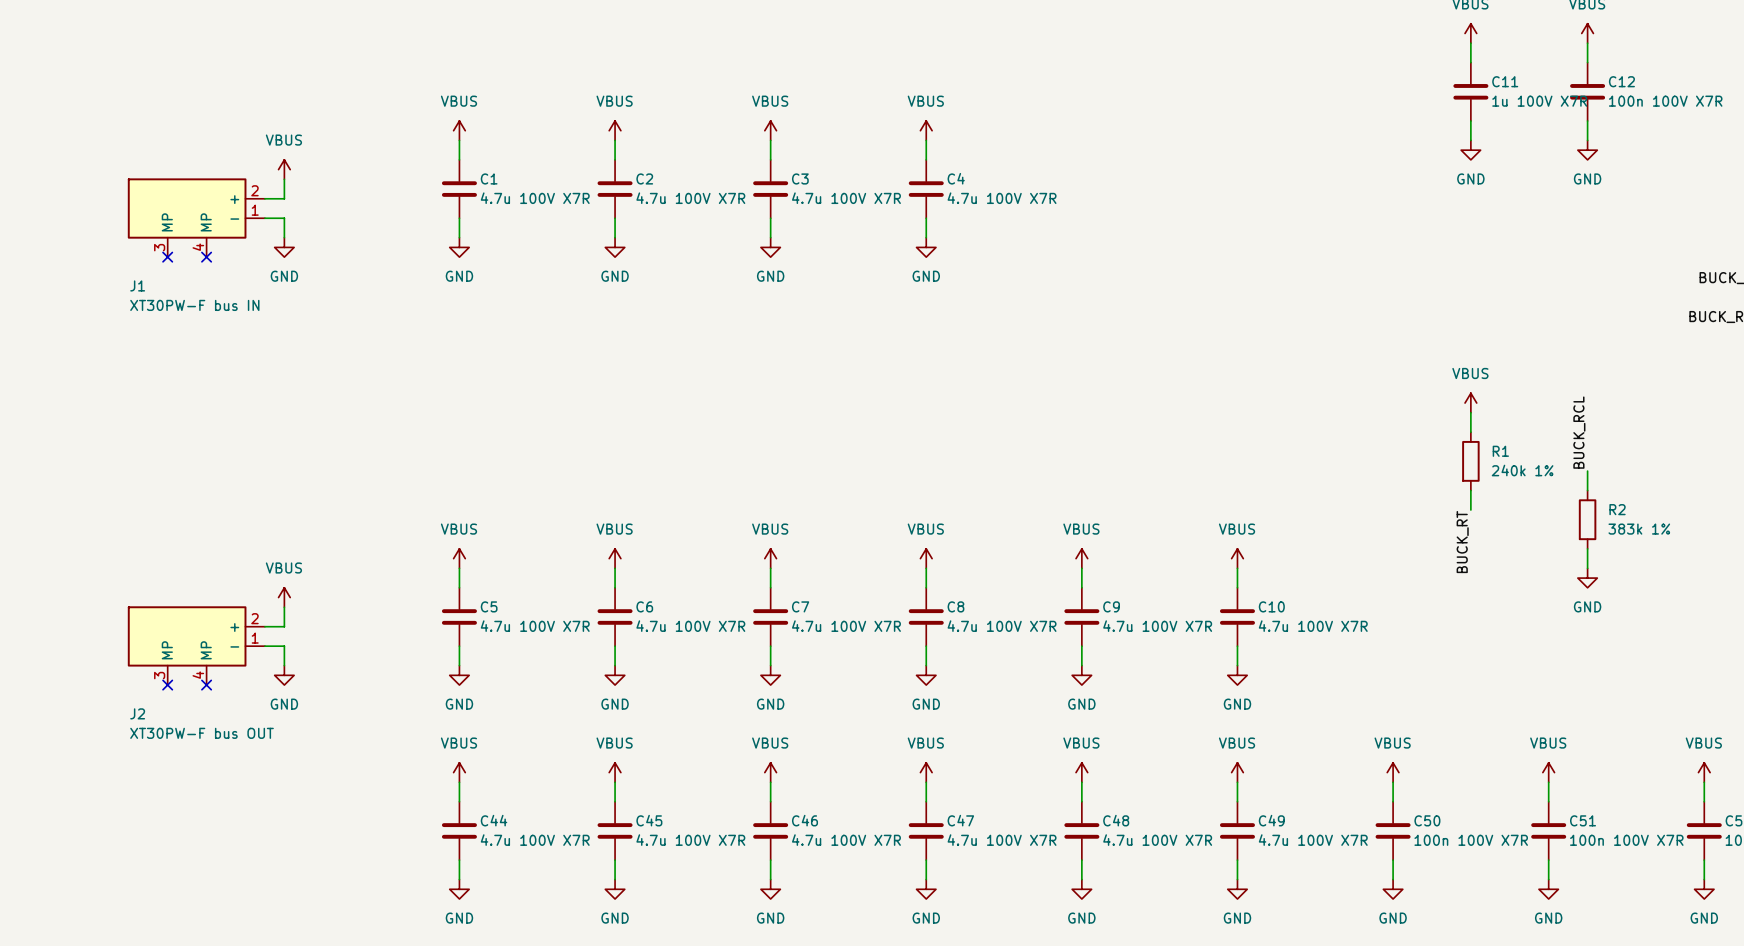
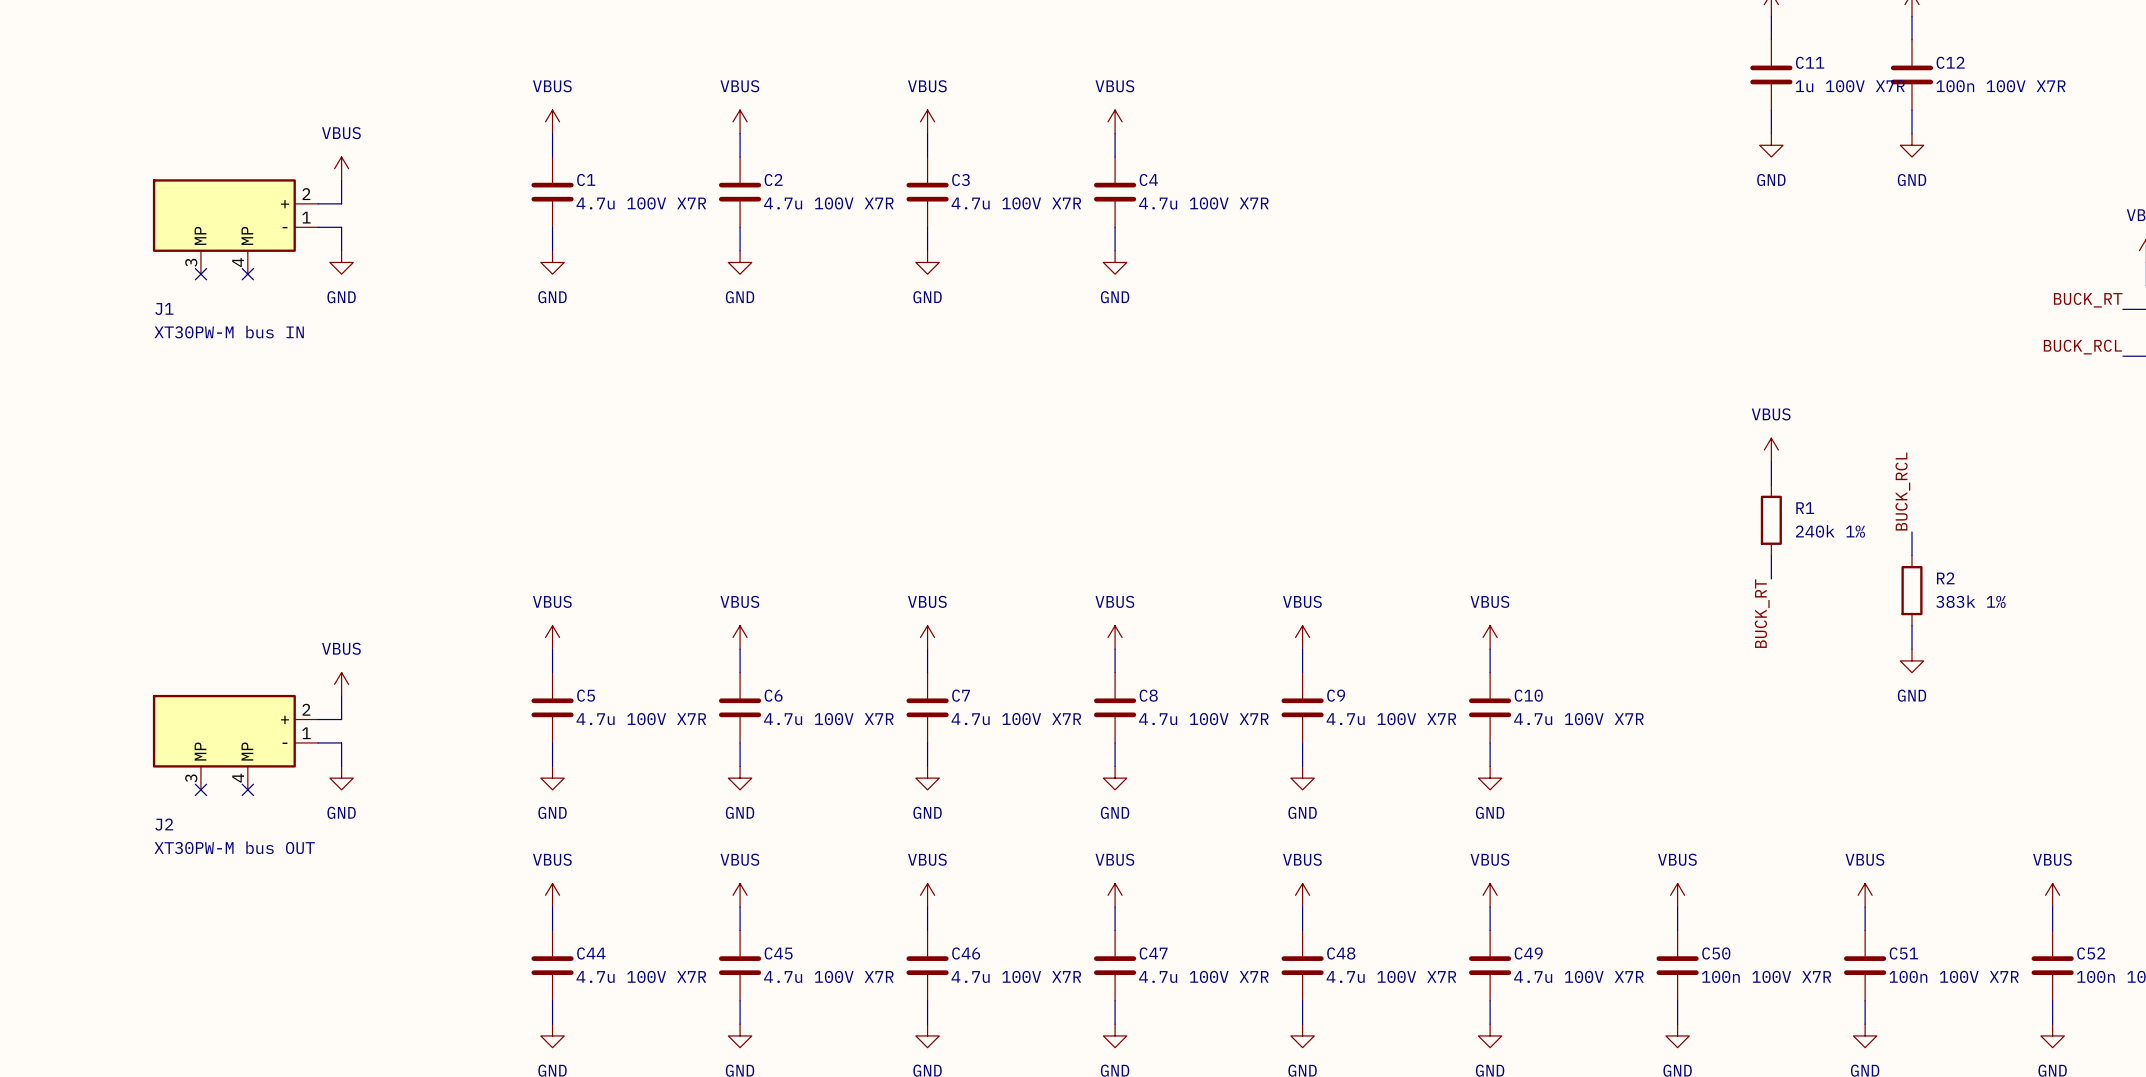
J1 value: XT30PW-F bus IN (194, 305) -> XT30PW-M bus IN (229, 332)
J2 value: XT30PW-F bus OUT (202, 733) -> XT30PW-M bus OUT (234, 847)

